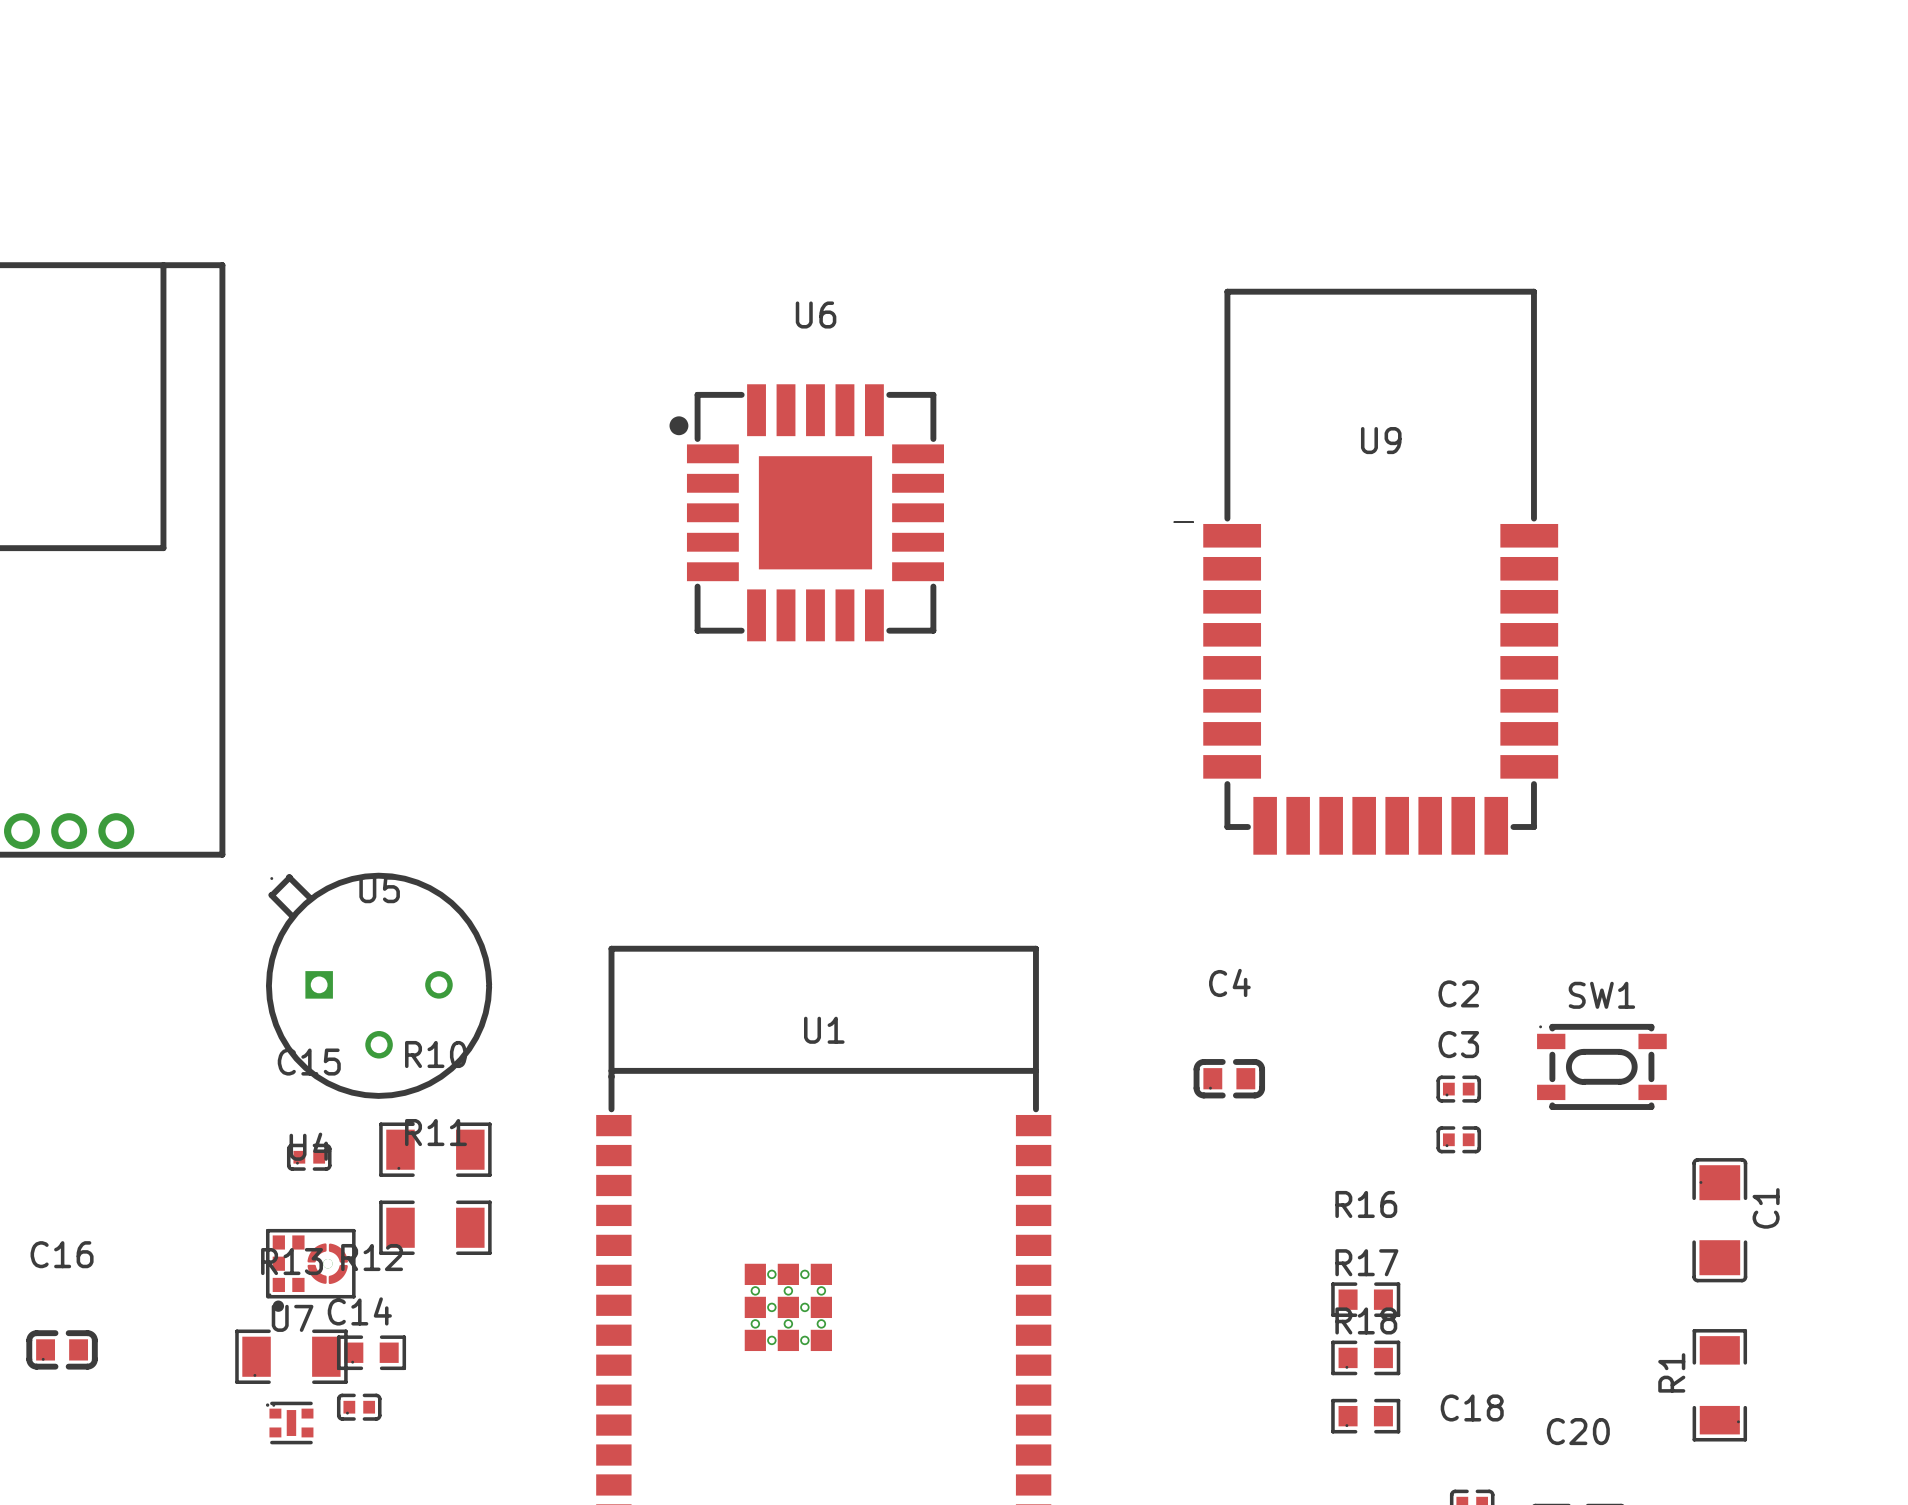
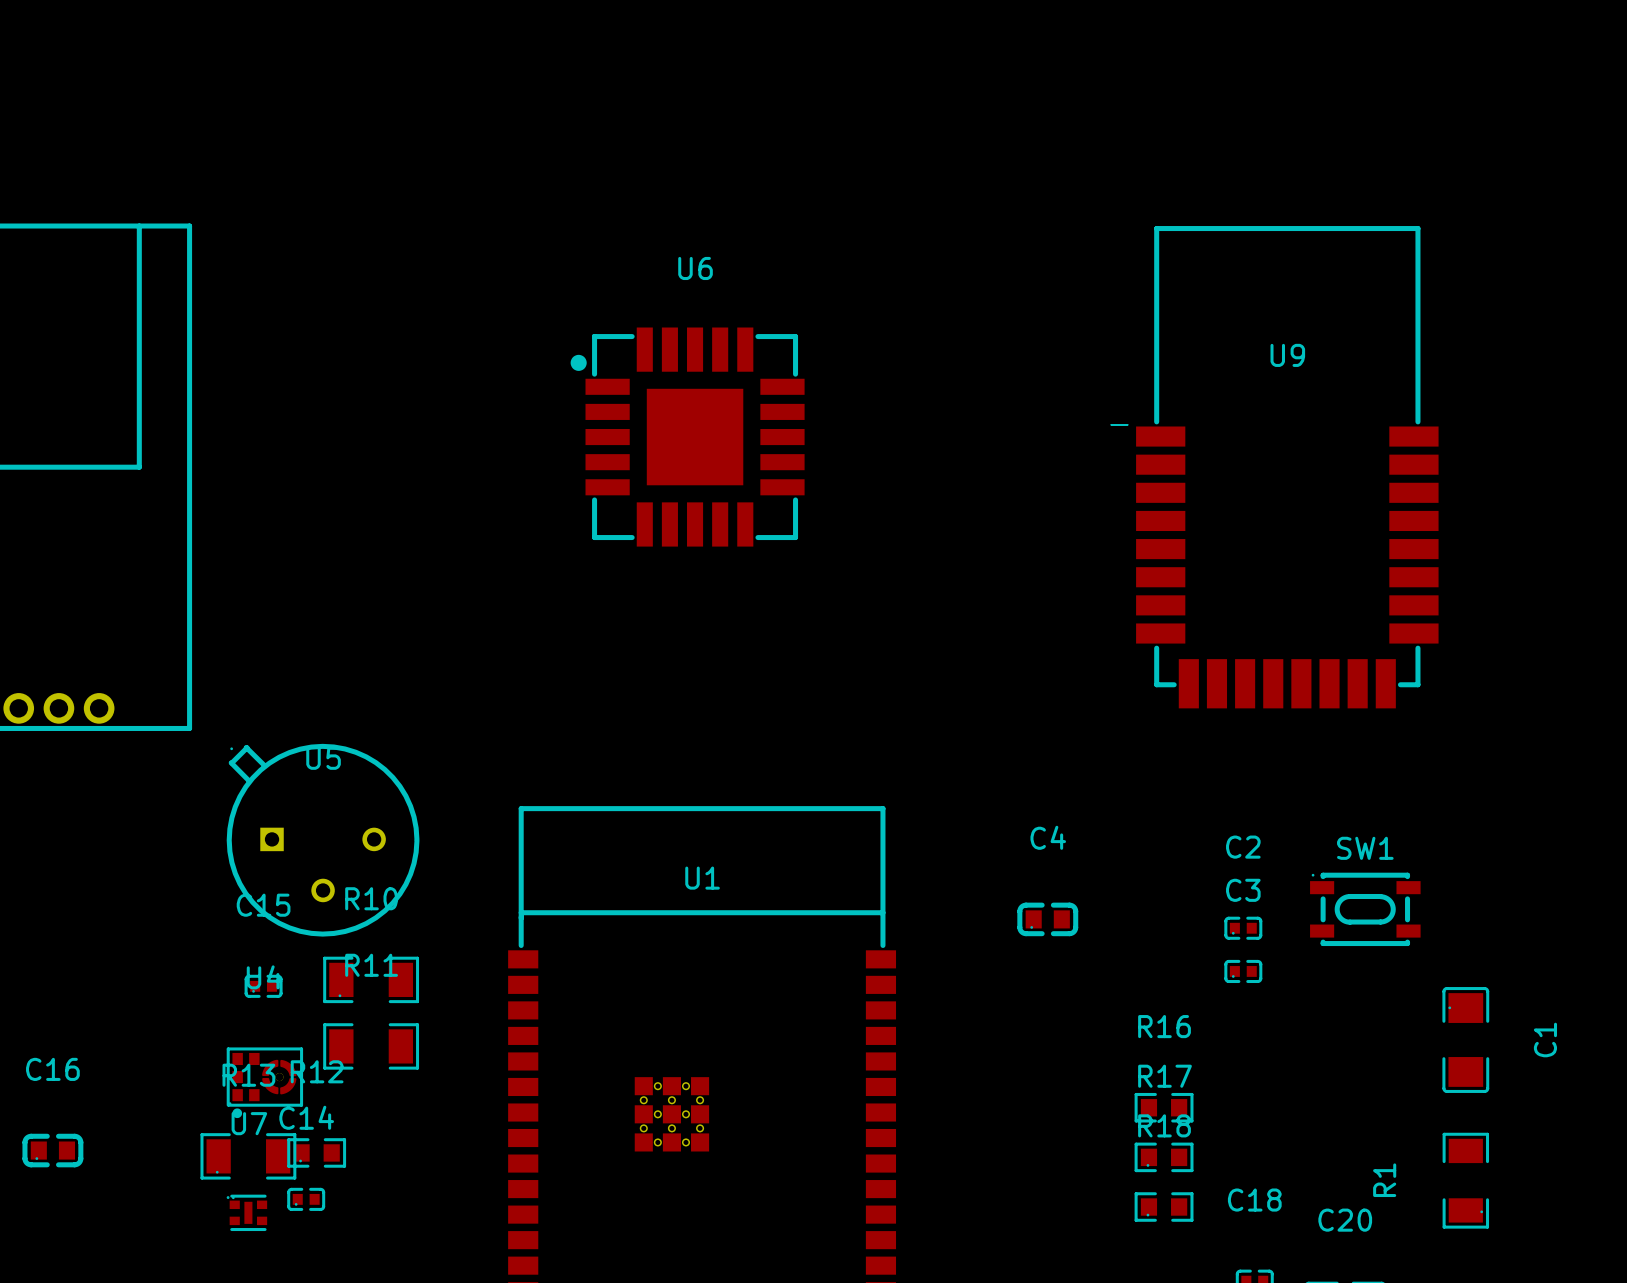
U9 position: (1366, 571) -> (1274, 467)
C1 name position: C1 (1766, 1208) -> C1 (1545, 1040)
R1 name position: R1 (1671, 1372) -> R1 (1384, 1180)

